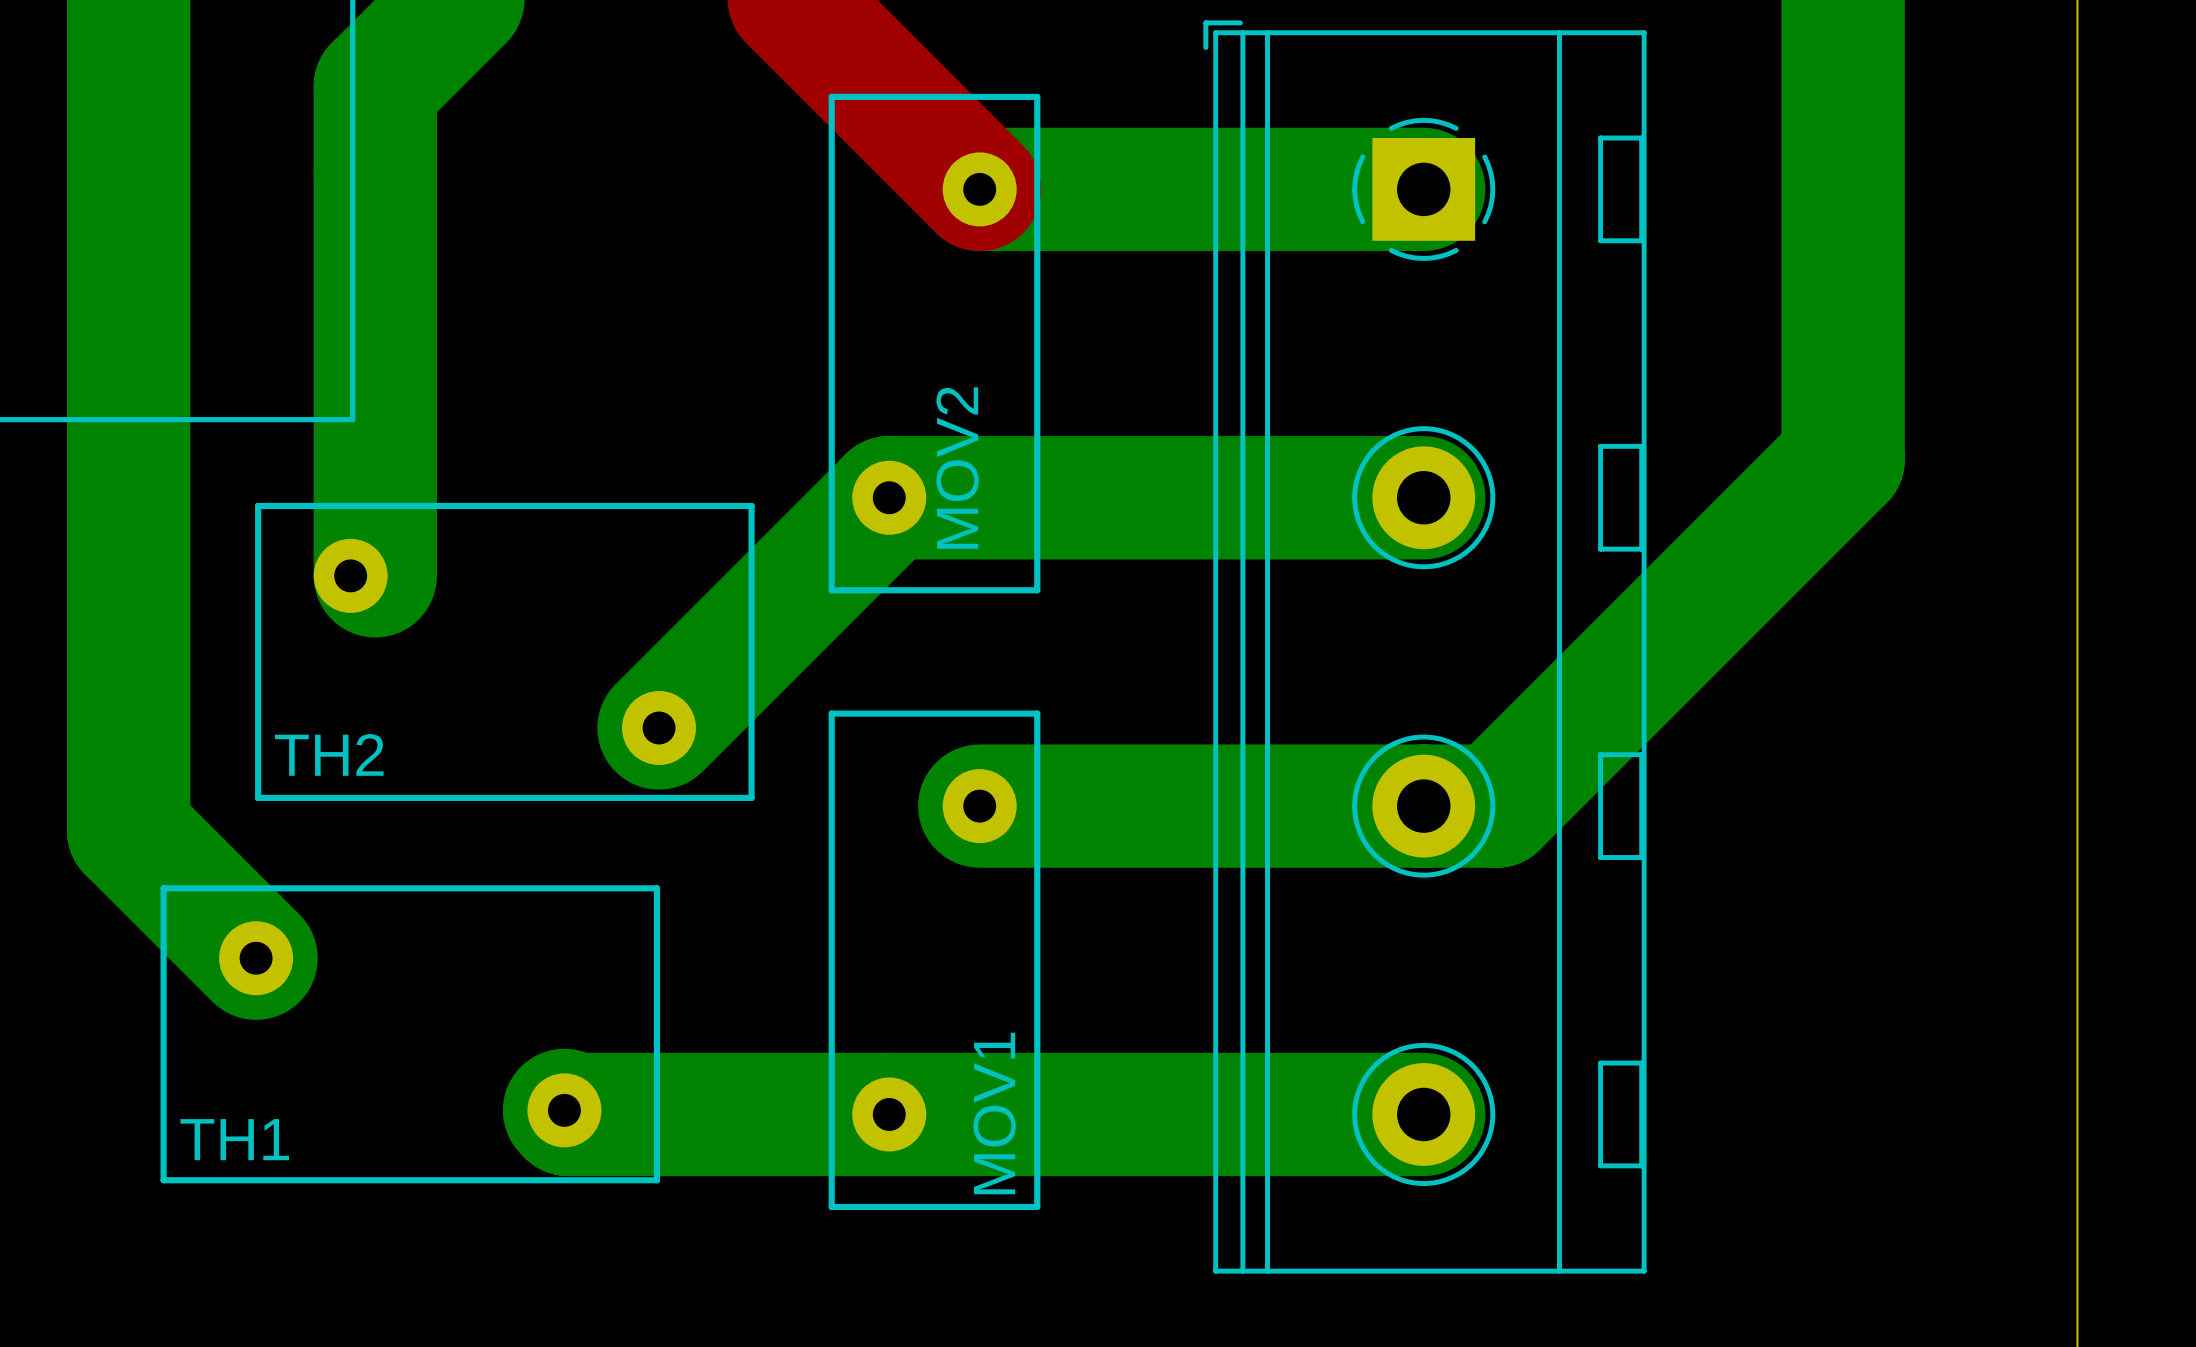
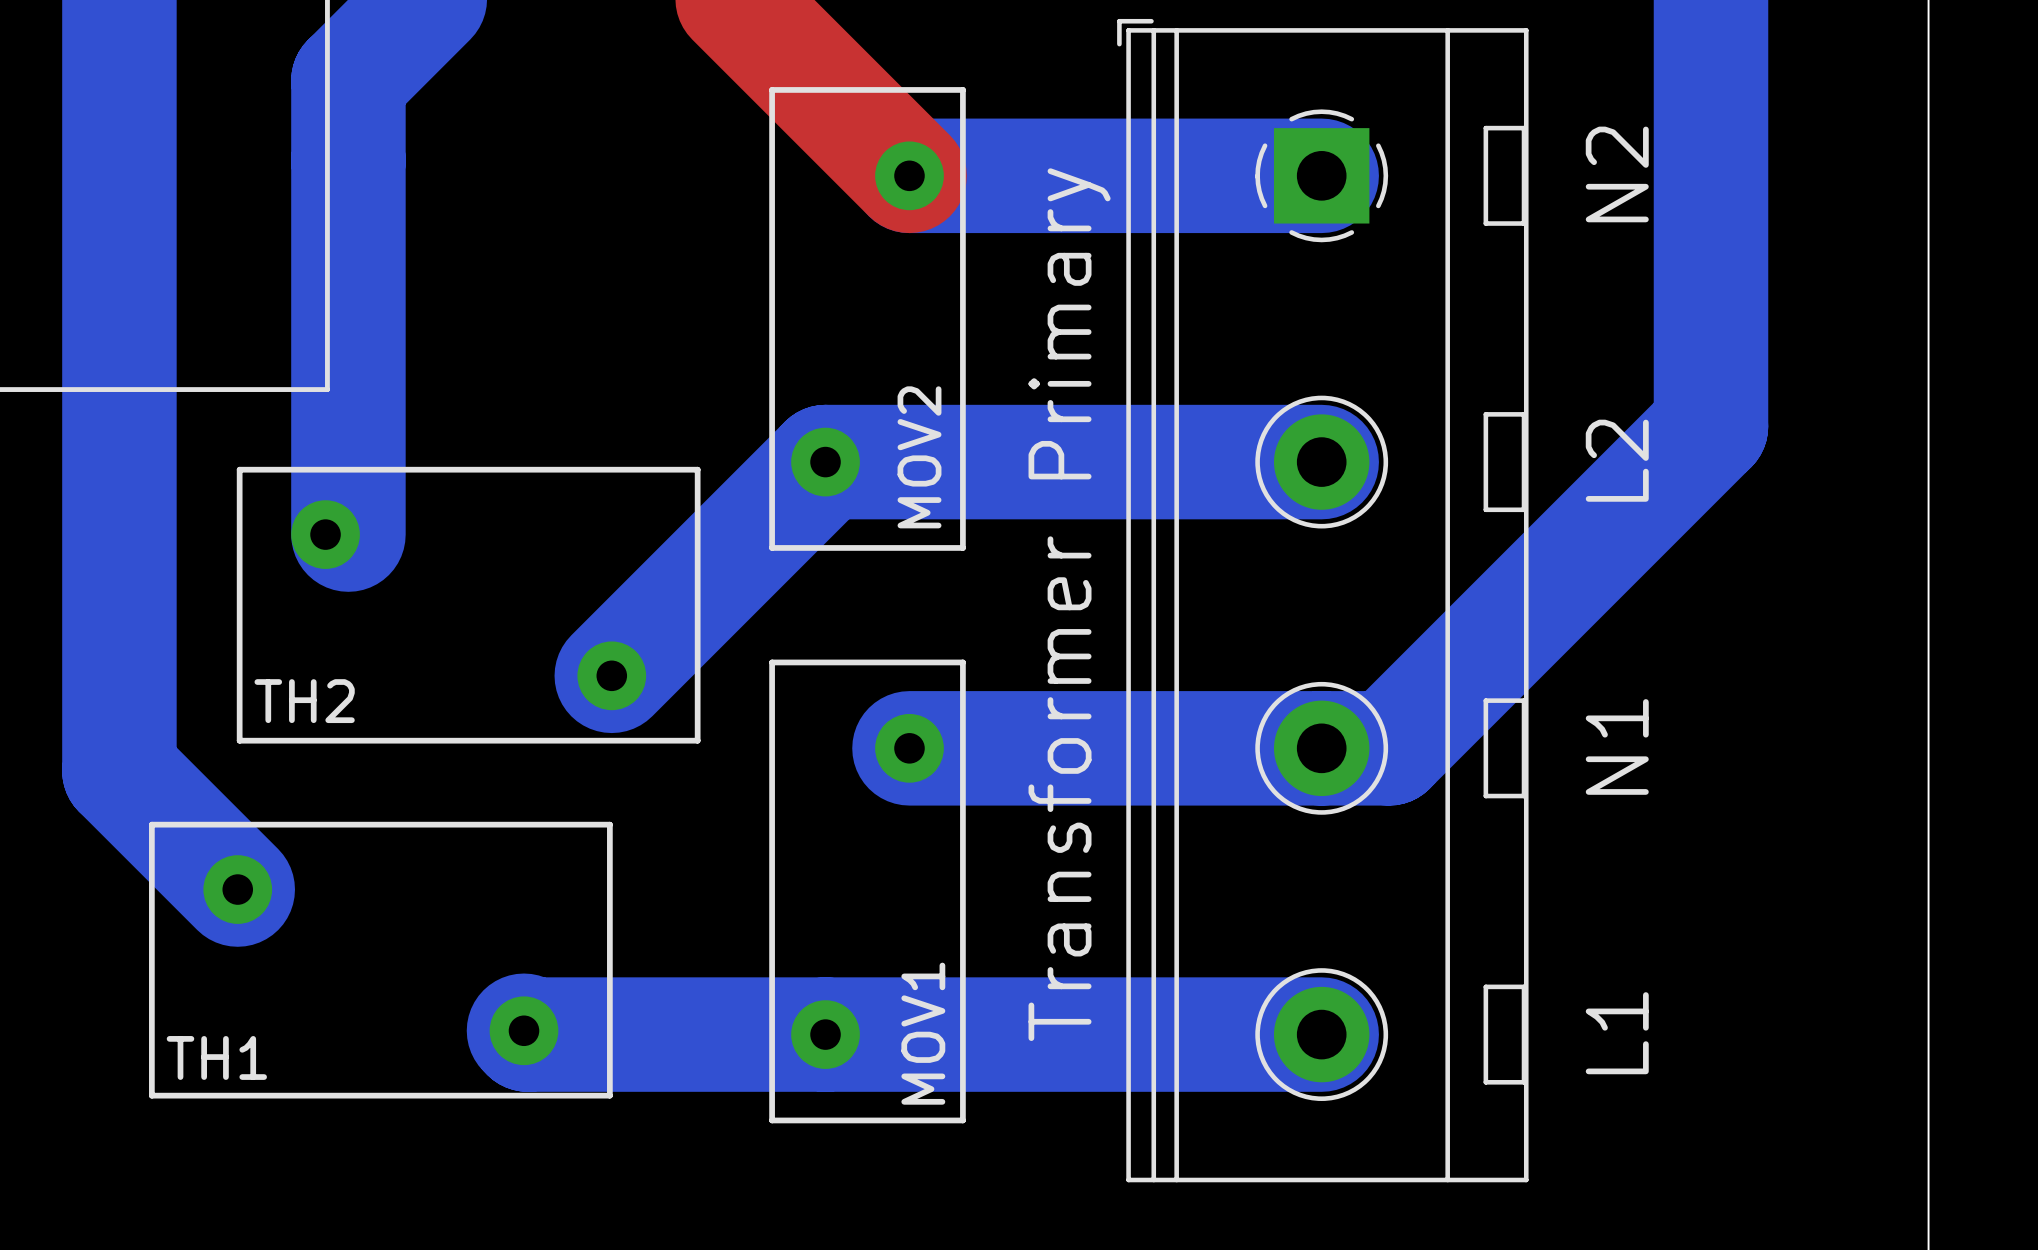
part text: none -> N2 (1617, 174)
MOV2 name position: MOV2 (957, 468) -> MOV2 (919, 457)
part text: none -> L2 (1617, 460)
part value: none -> Transformer Primary (1069, 604)
part text: none -> N1 (1617, 746)
part text: none -> L1 (1617, 1033)

